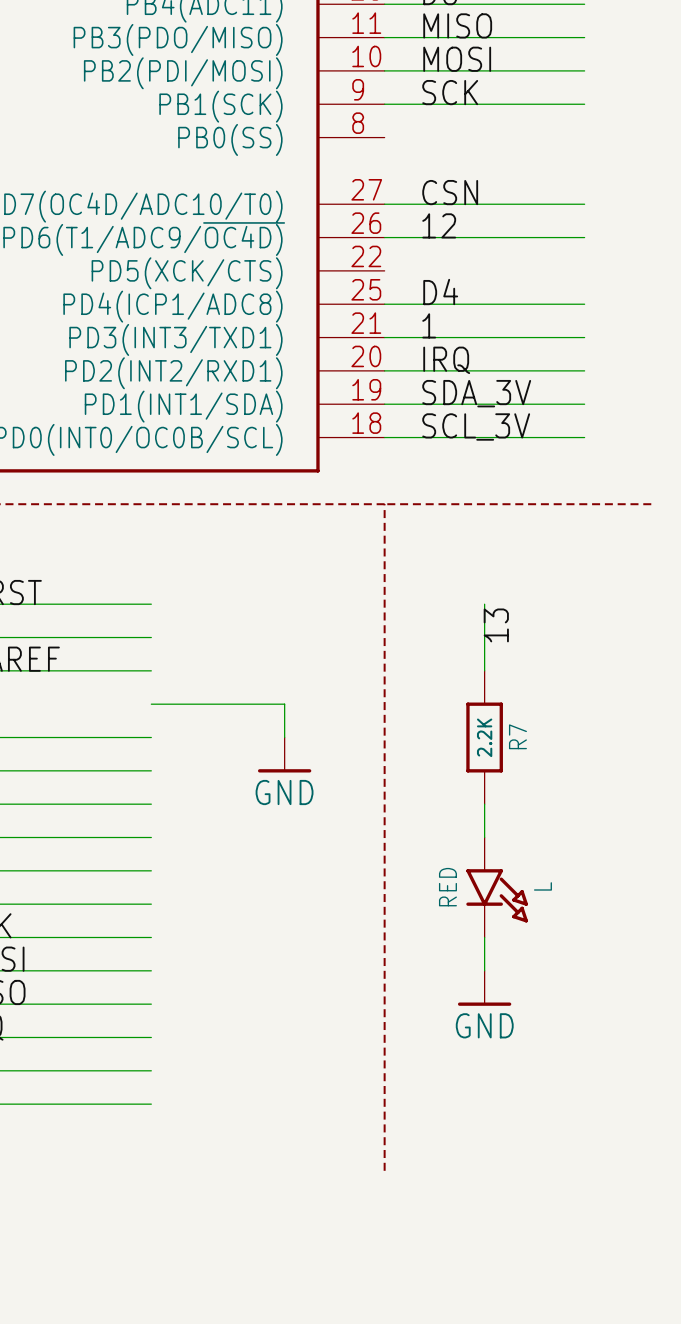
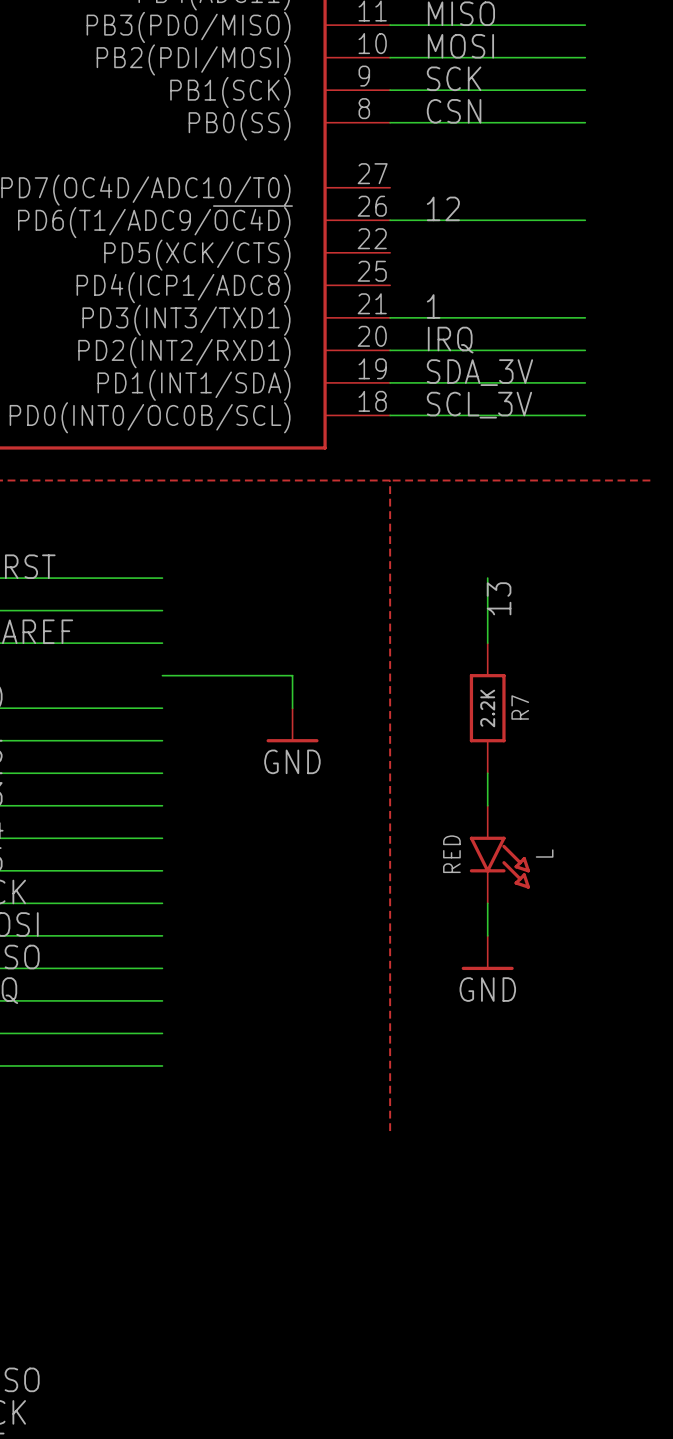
label position: CSN (450, 192) -> CSN (454, 111)
wire: (384, 204) (584, 204) -> (390, 122) (585, 122)
label: D4 (440, 292) -> none
wire: (384, 304) (584, 304) -> none

